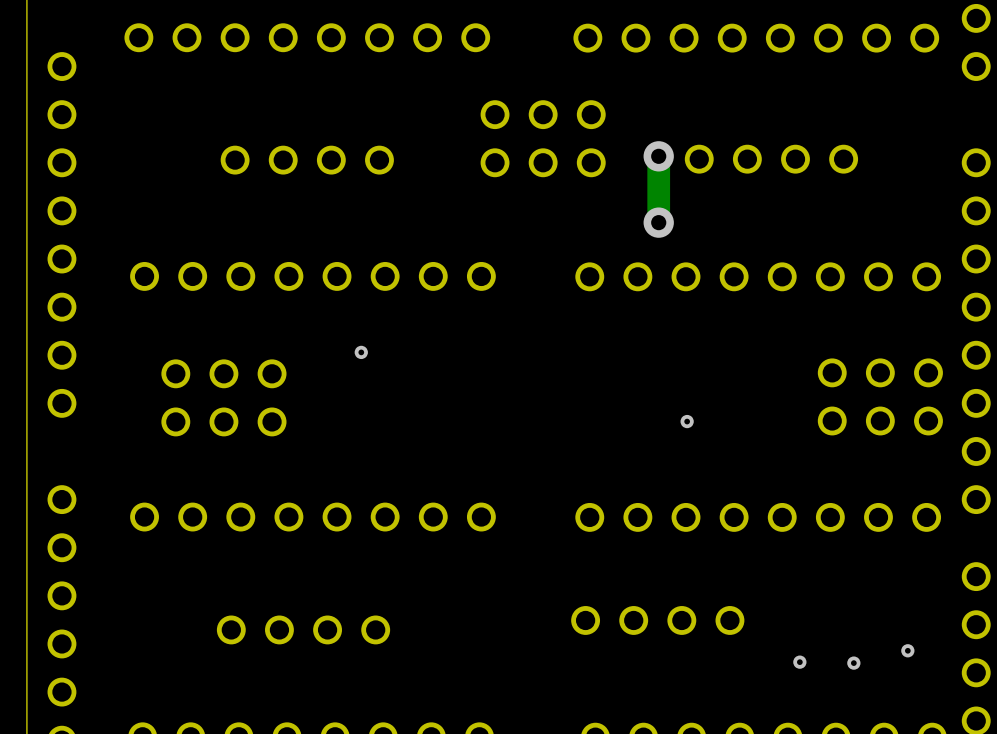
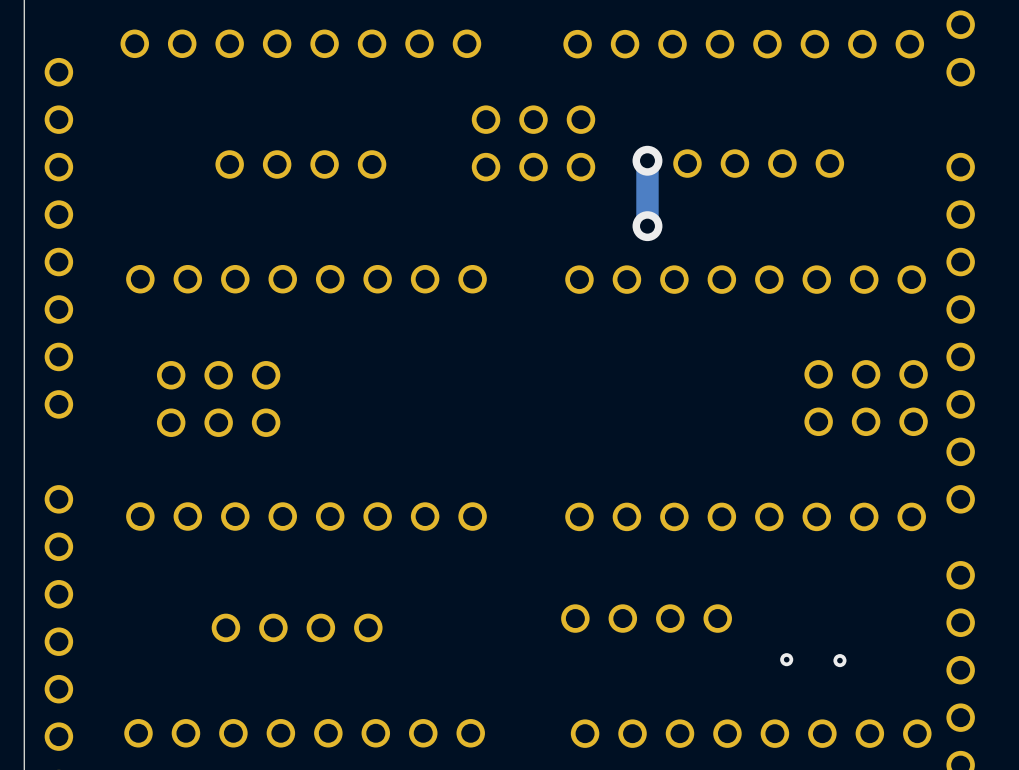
via: (361, 352) -> none
via: (687, 421) -> none
via: (907, 650) -> none

